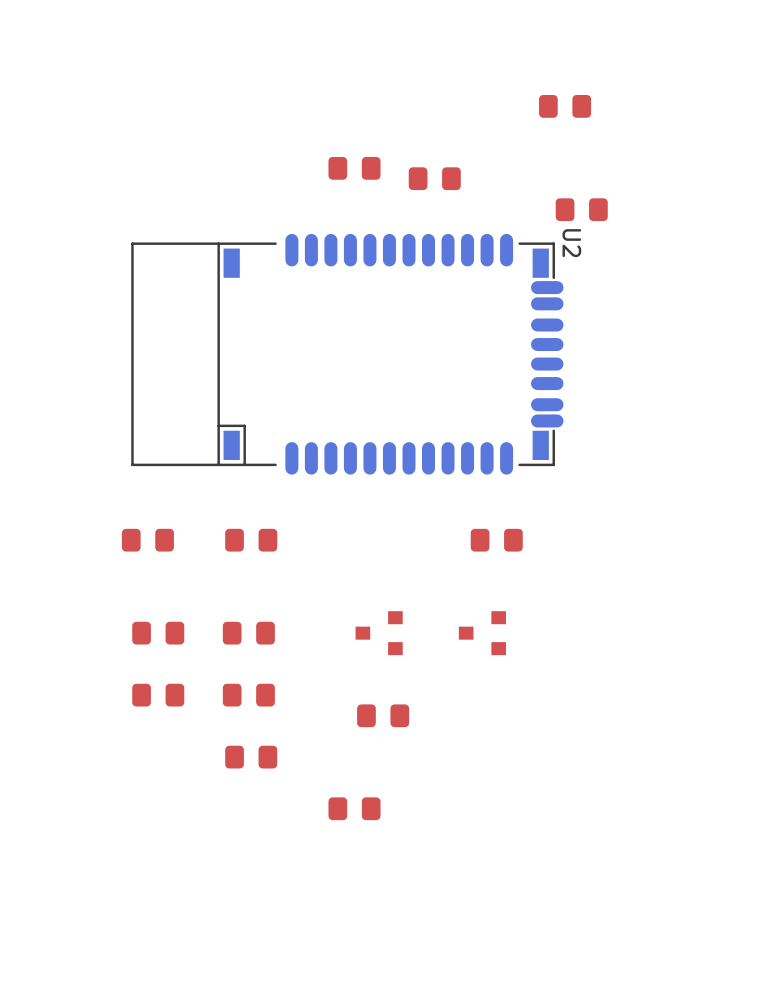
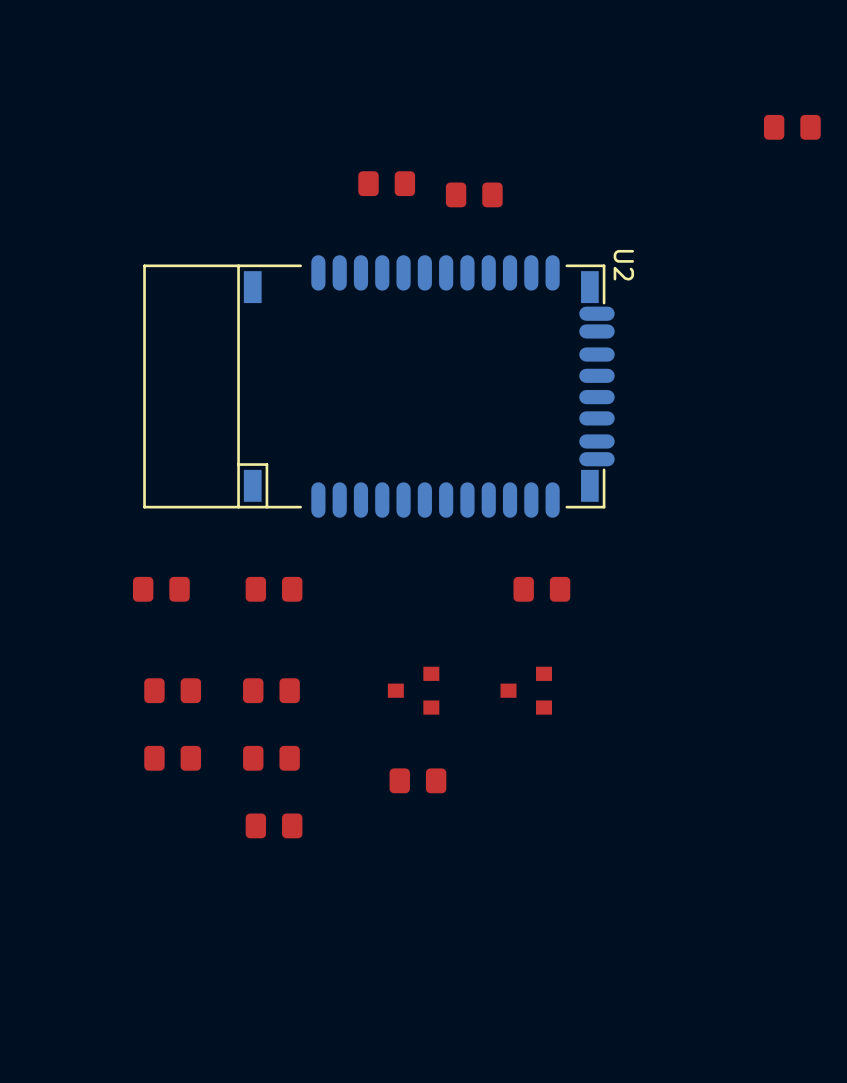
part: (565, 106) -> none
part: none -> (792, 127)
part: (581, 209) -> none
part: (354, 808) -> none

